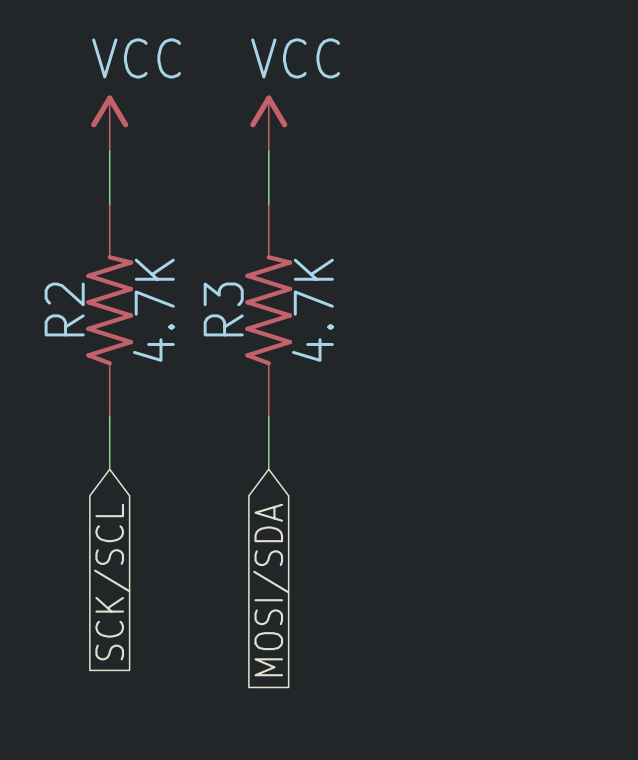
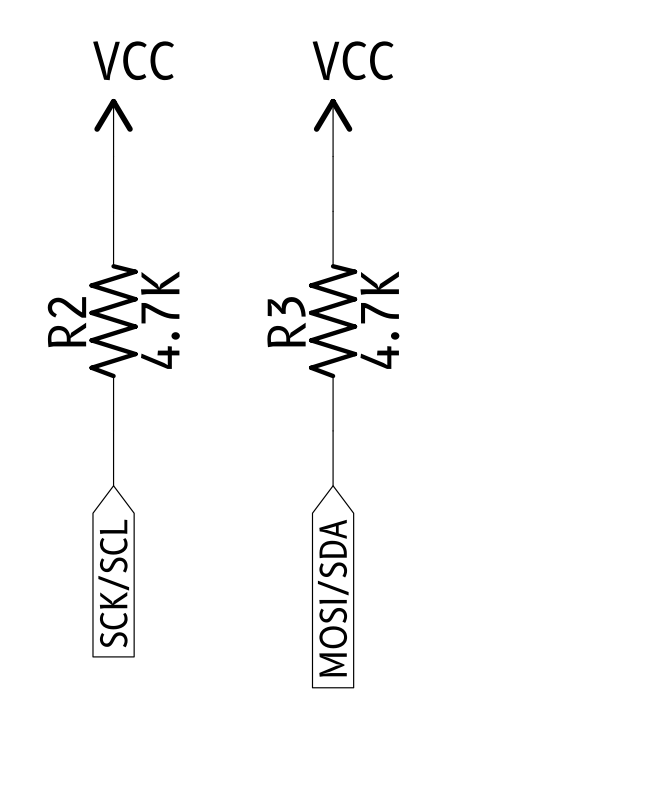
power symbol position: VCC (268, 123) -> VCC (333, 127)
wire: (268, 151) (268, 204) -> (333, 156) (333, 211)
R3 position: (268, 310) -> (333, 321)
wire: (268, 416) (268, 469) -> (333, 430) (333, 485)
global label position: MOSI/SDA (271, 590) -> MOSI/SDA (333, 598)

